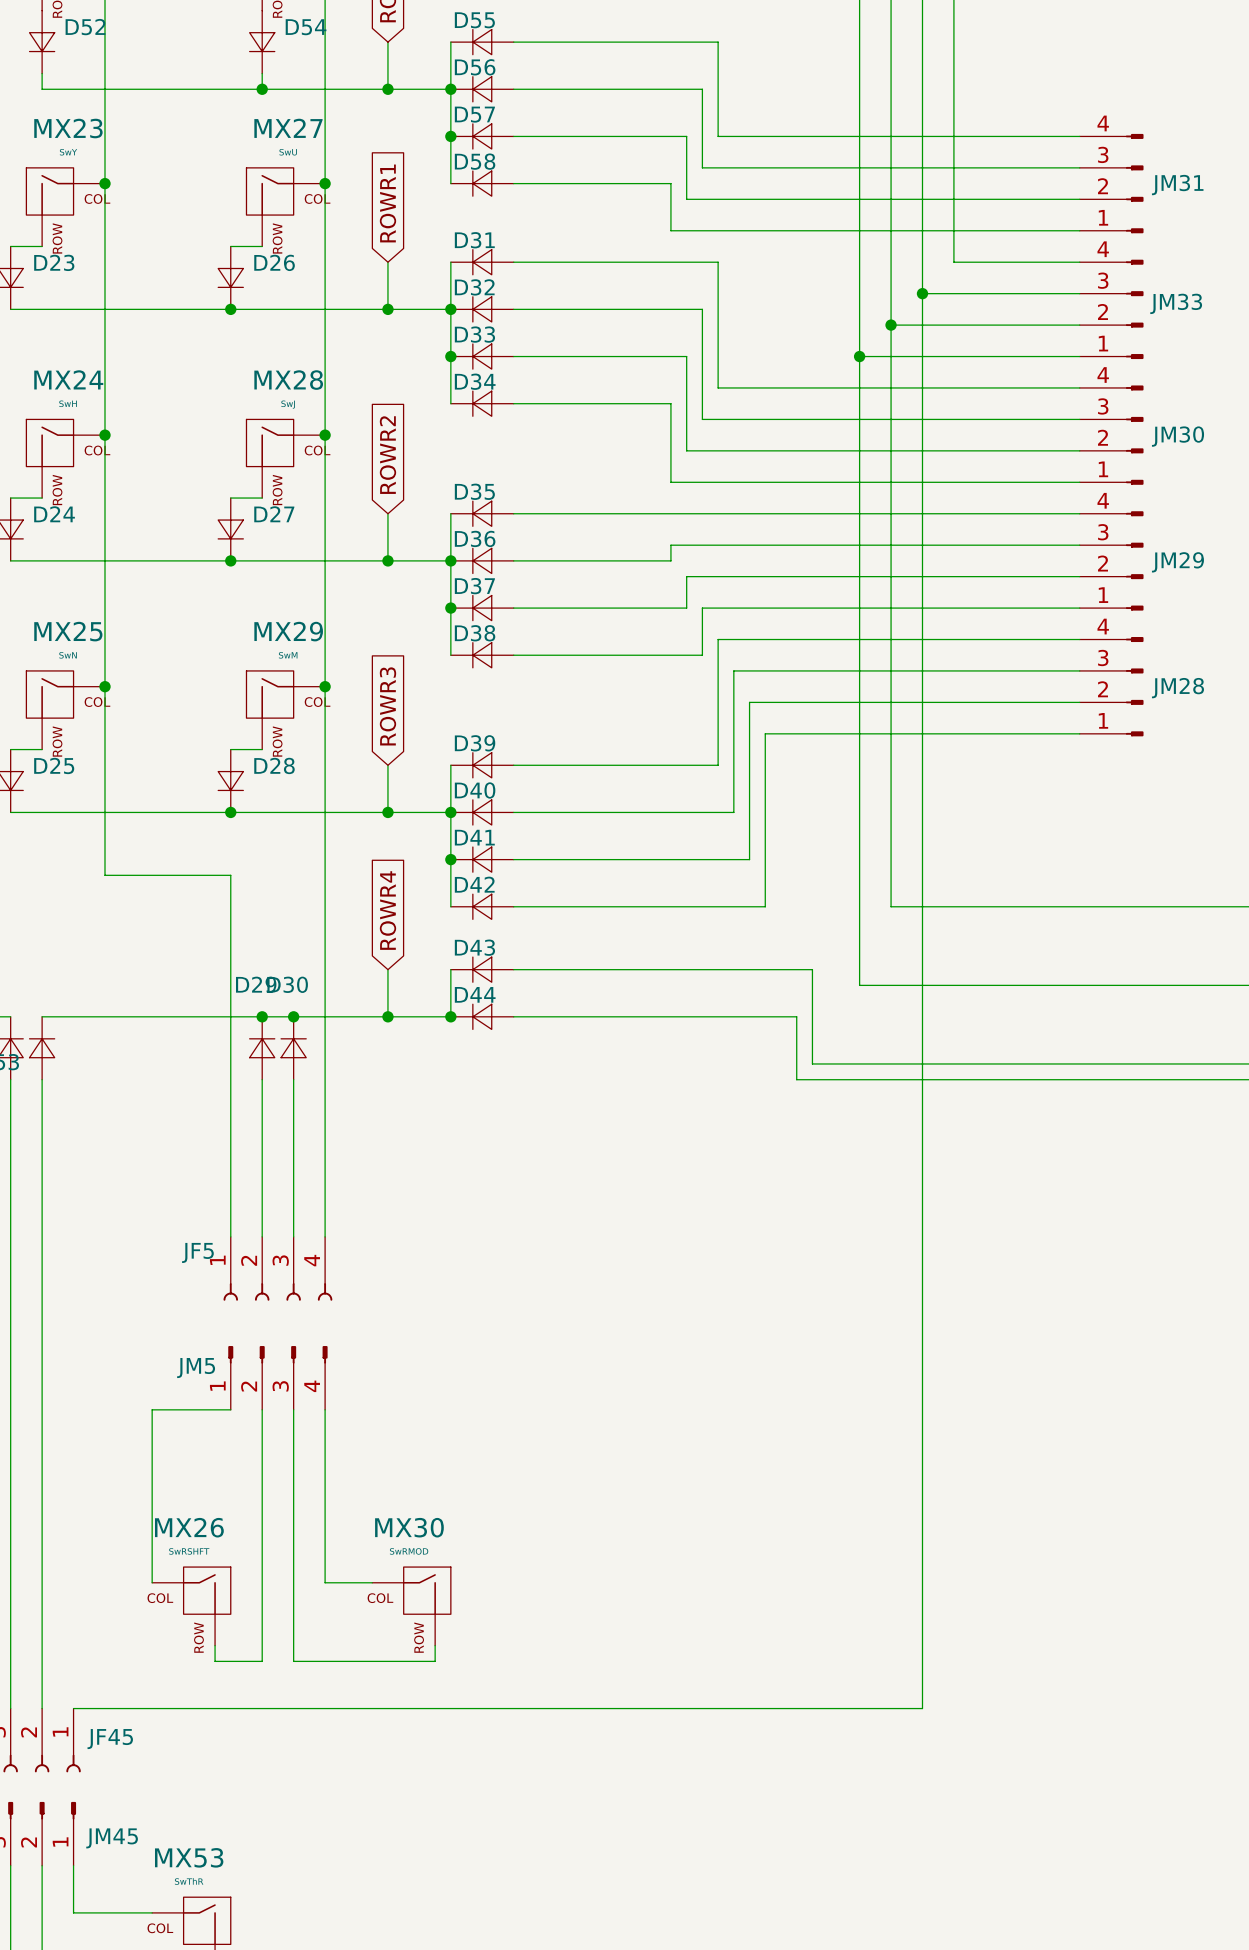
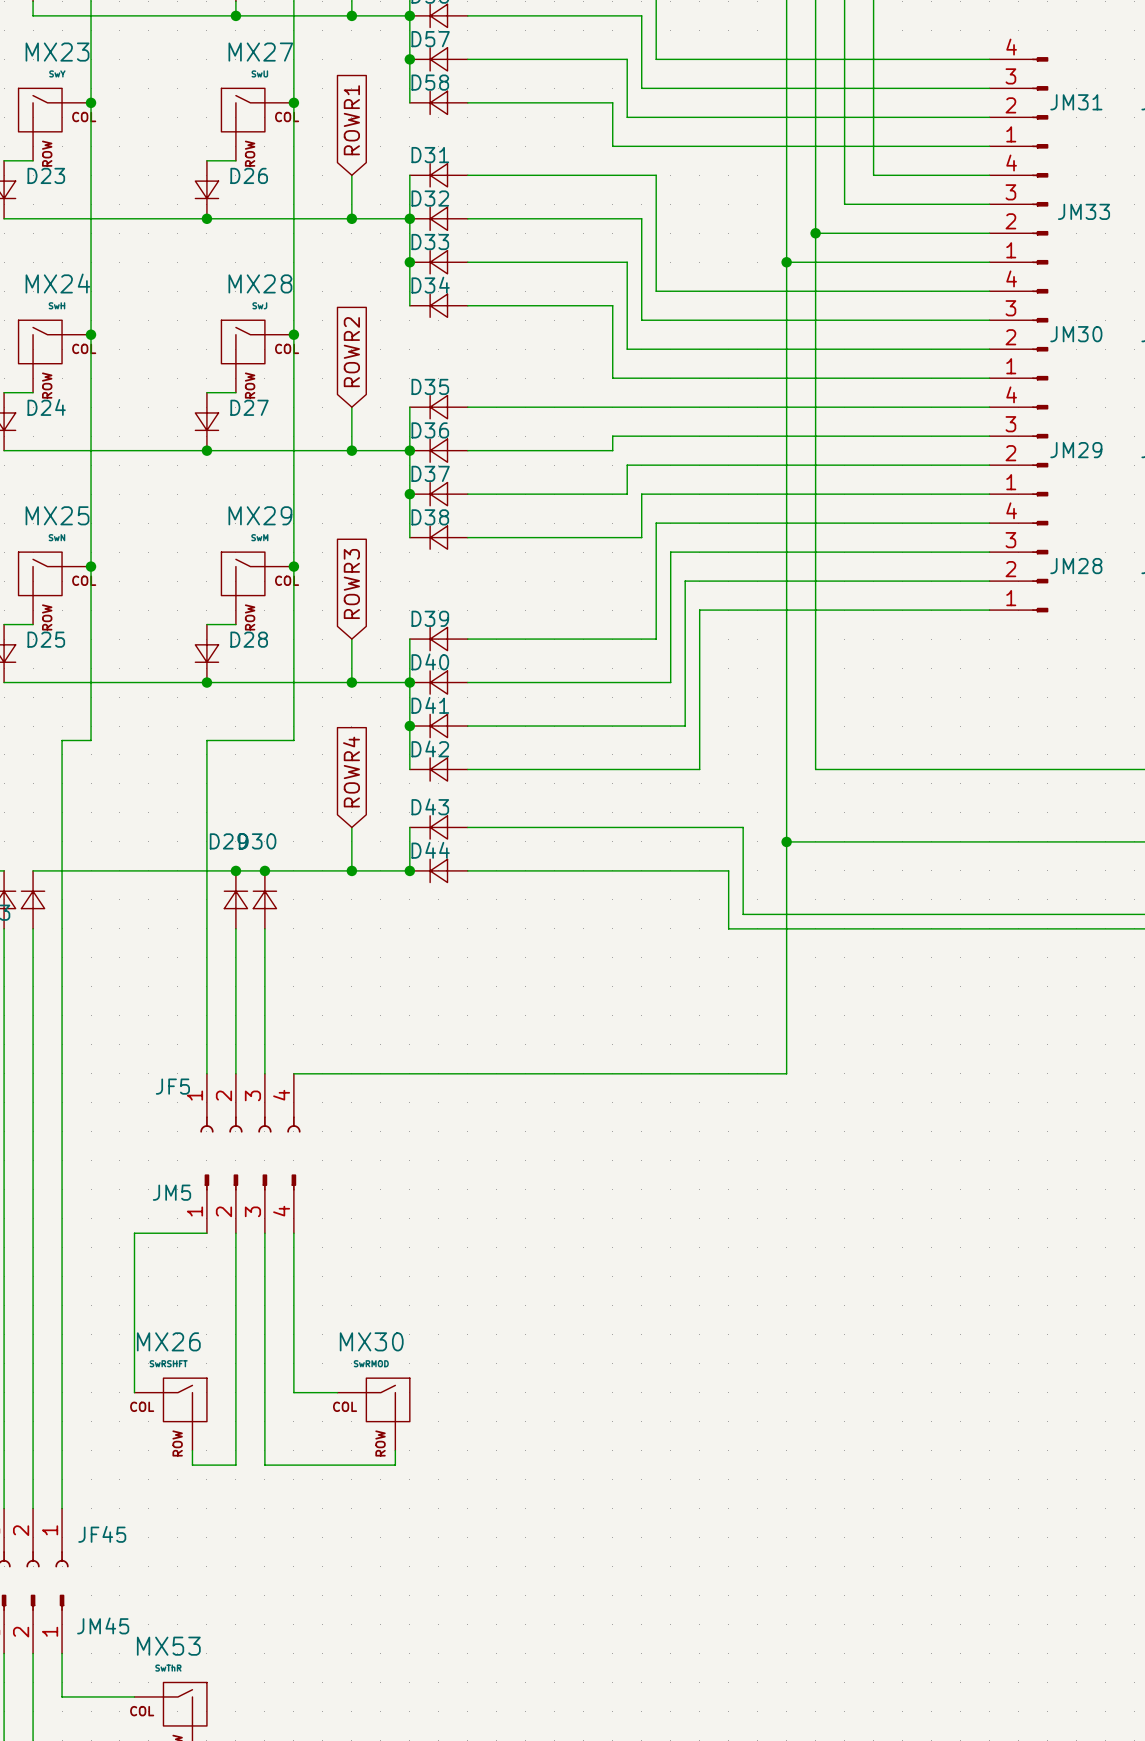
wire: (922, 293) (922, 1708) (73, 1708) -> (91, 740) (62, 740) (62, 1508)
junction: (922, 293) -> none
wire: (104, 875) (230, 875) -> (293, 740) (206, 740)
wire: (325, 875) (325, 1236) -> (786, 841) (786, 1073) (293, 1073)
junction: none -> (786, 841)

